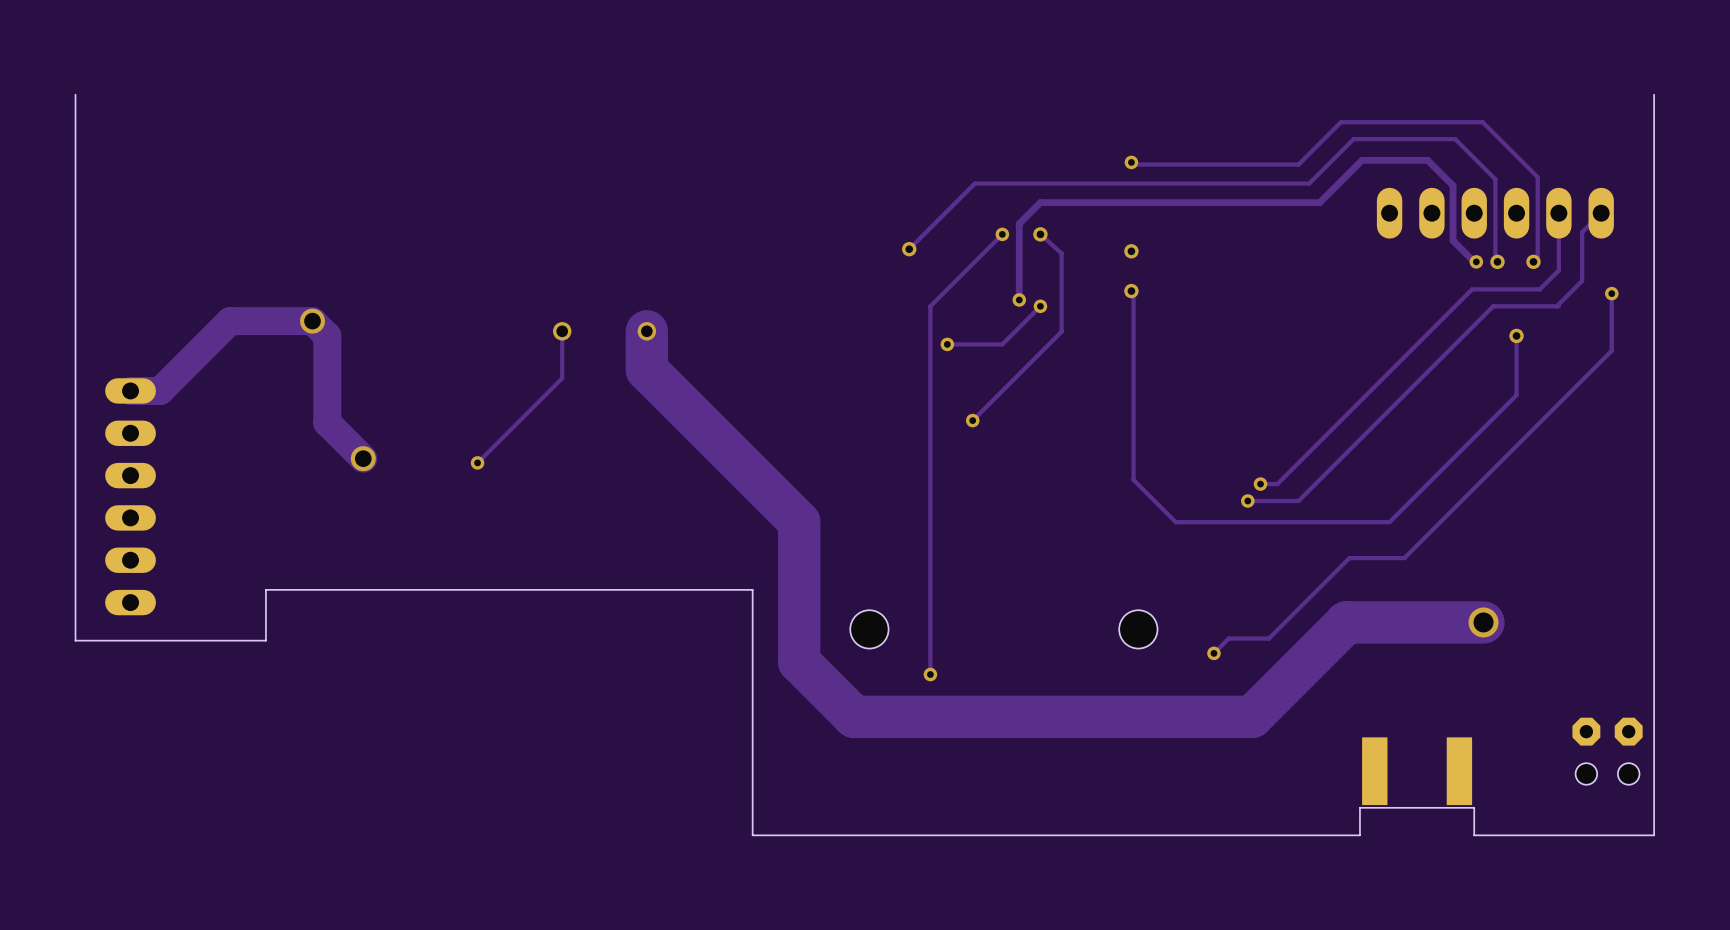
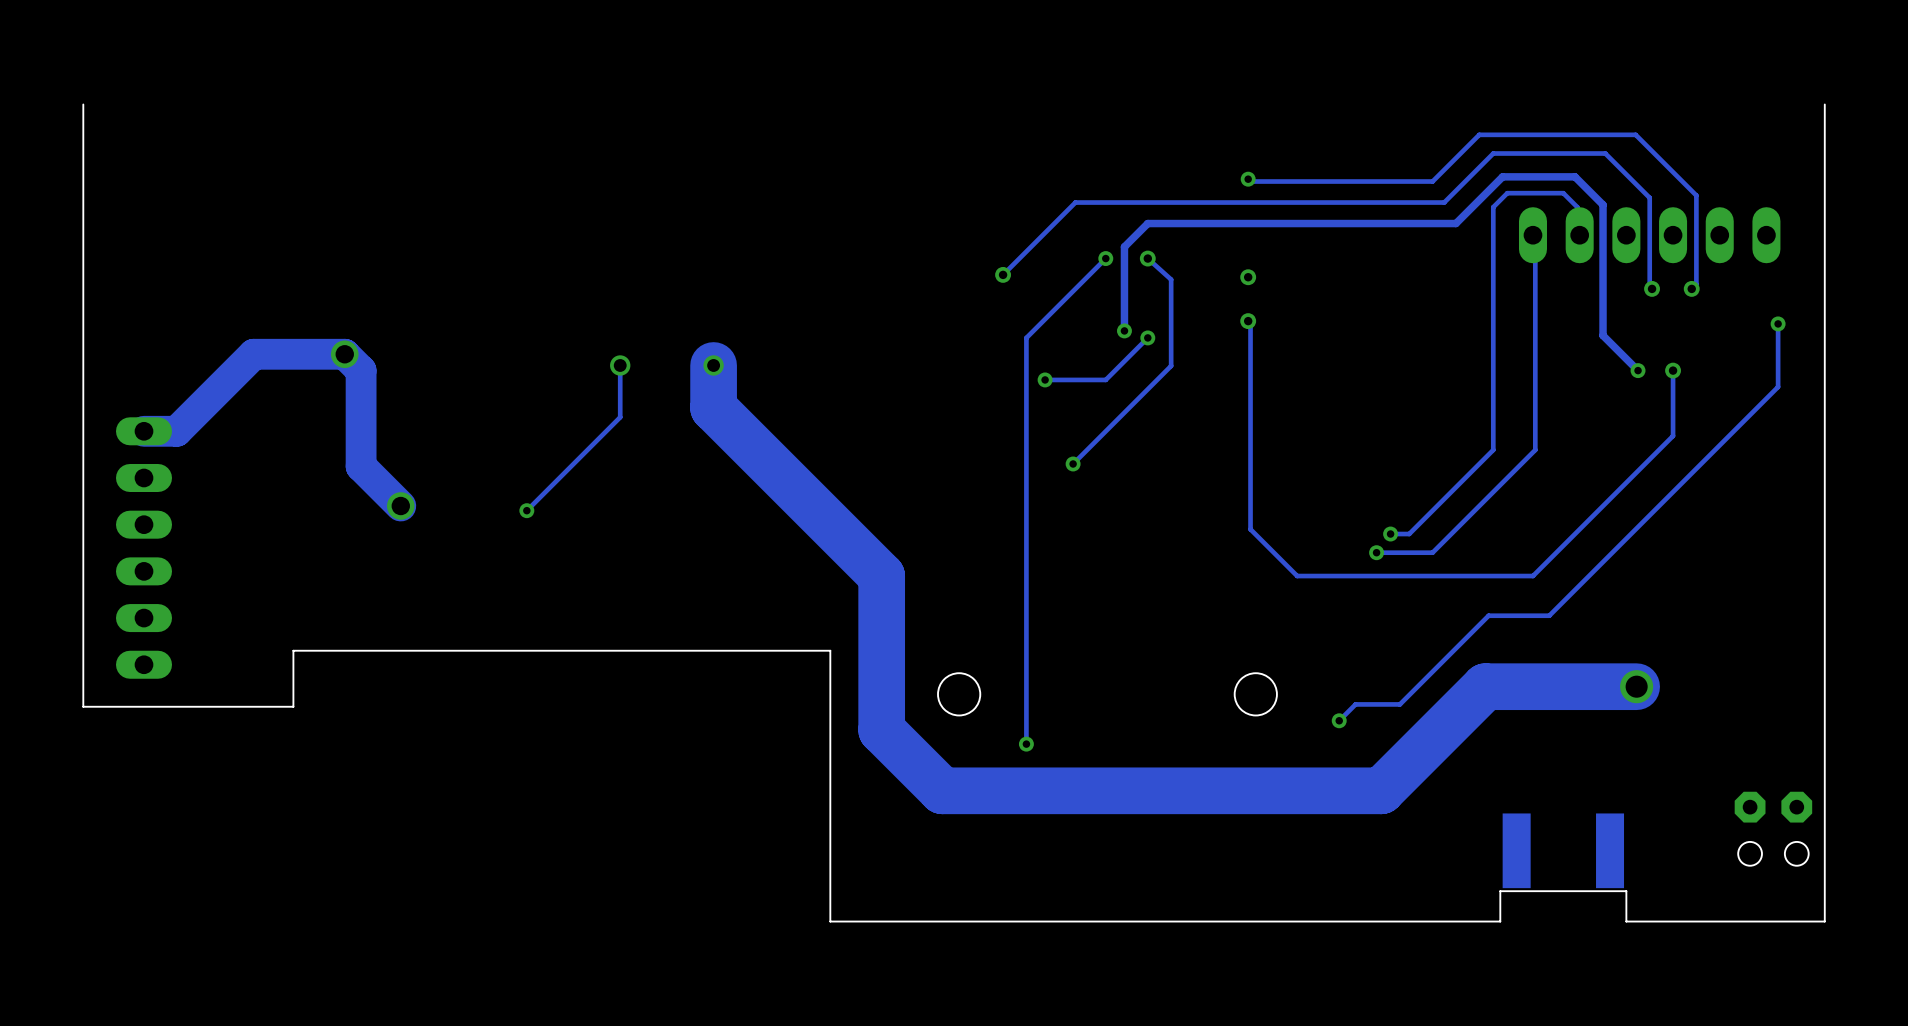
track: (1558, 213) (1558, 270) (1539, 289) (1472, 289) (1353, 407) -> (1579, 235) (1577, 232) (1577, 207) (1563, 193) (1507, 193) (1493, 207) (1493, 449)
track: (1601, 213) (1582, 232) (1582, 280) (1556, 306) -> none
track: (1453, 240) (1476, 261) -> (1603, 265) (1603, 335) (1638, 370)
via position: (1476, 261) -> (1638, 370)
track: (1558, 306) (1493, 306) (1391, 407) -> (1532, 235) (1535, 237) (1535, 449)

